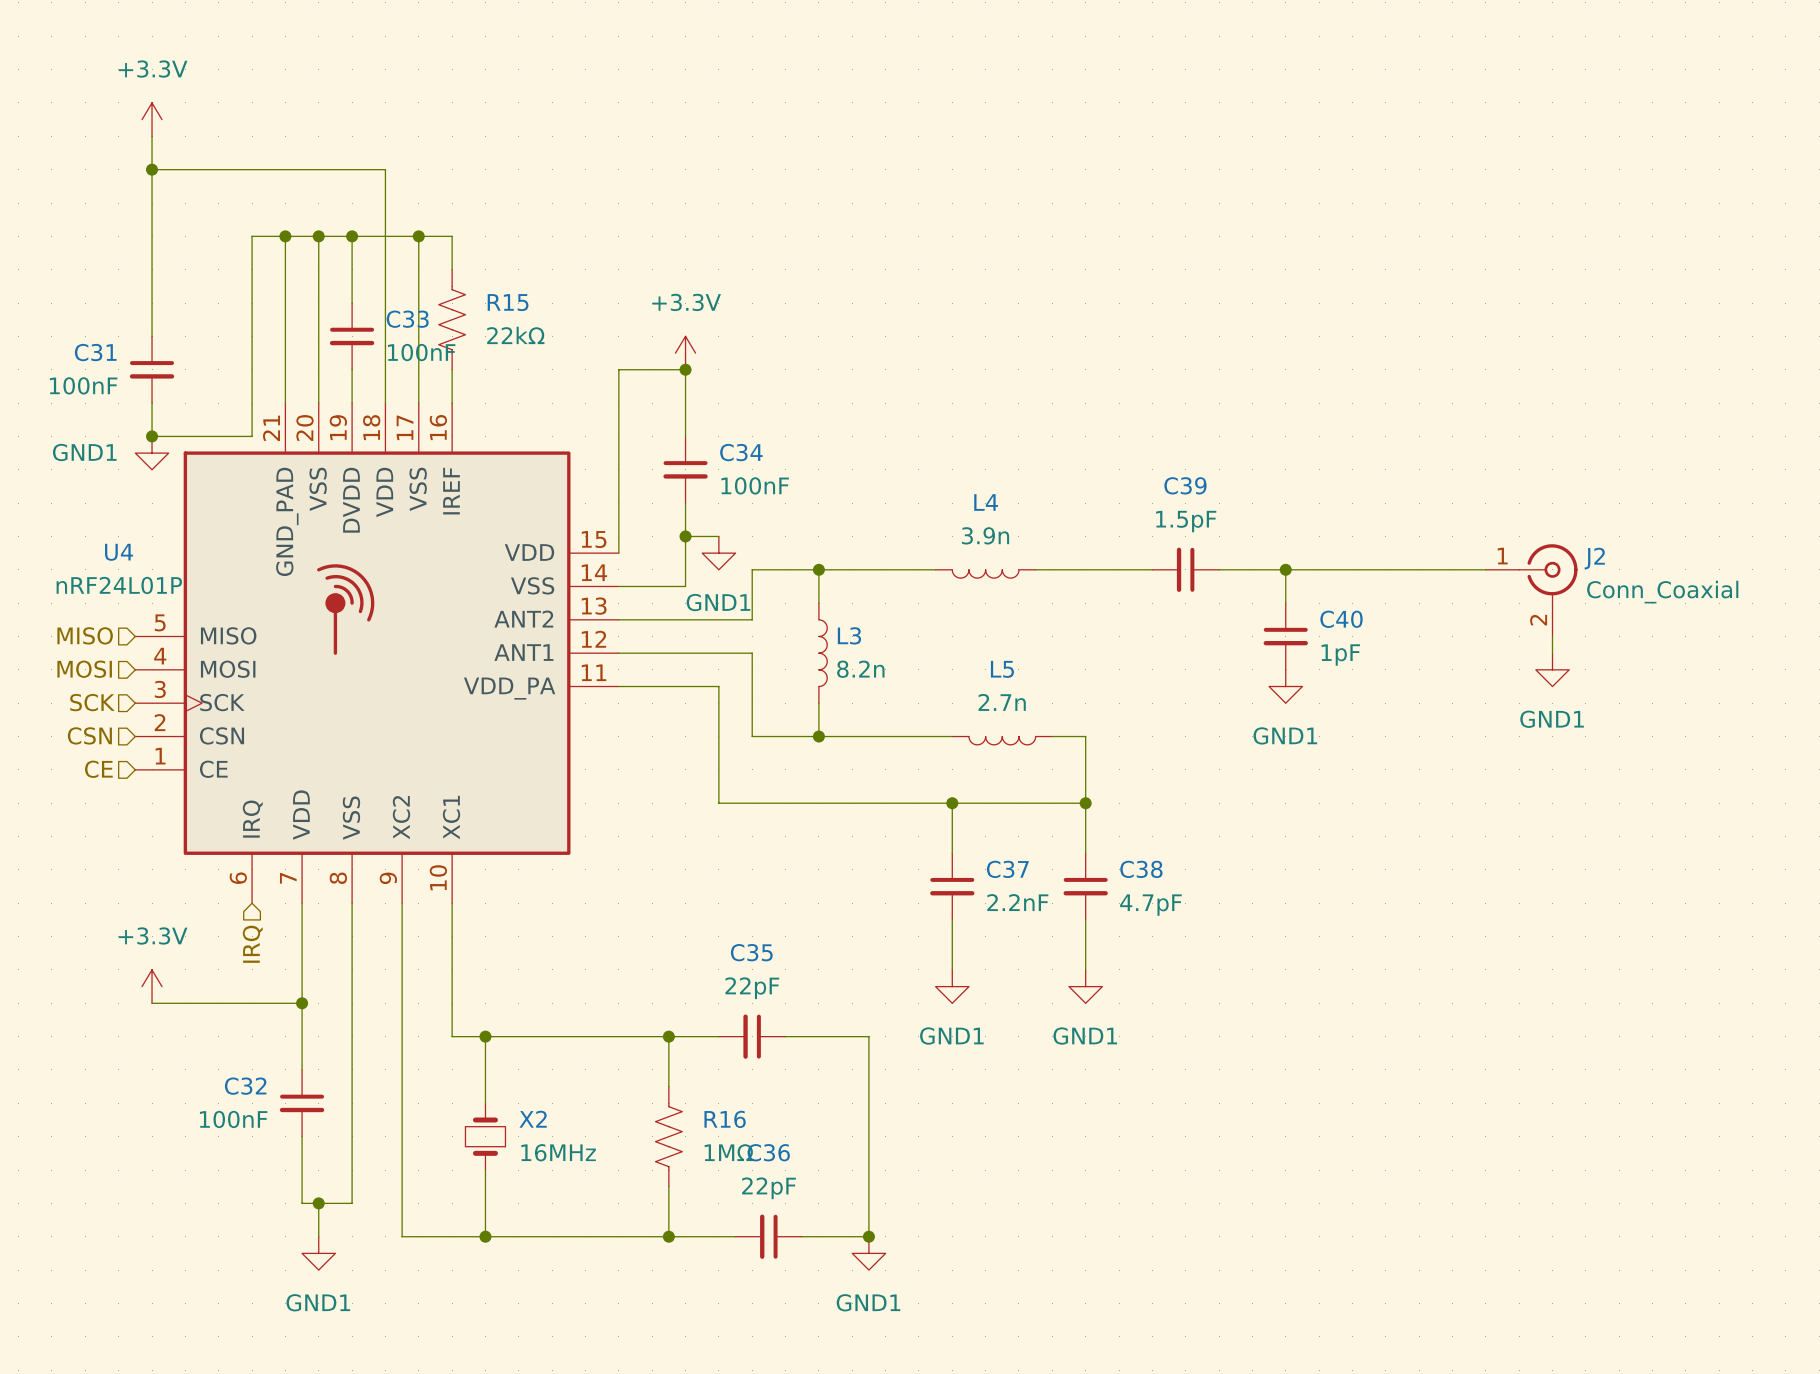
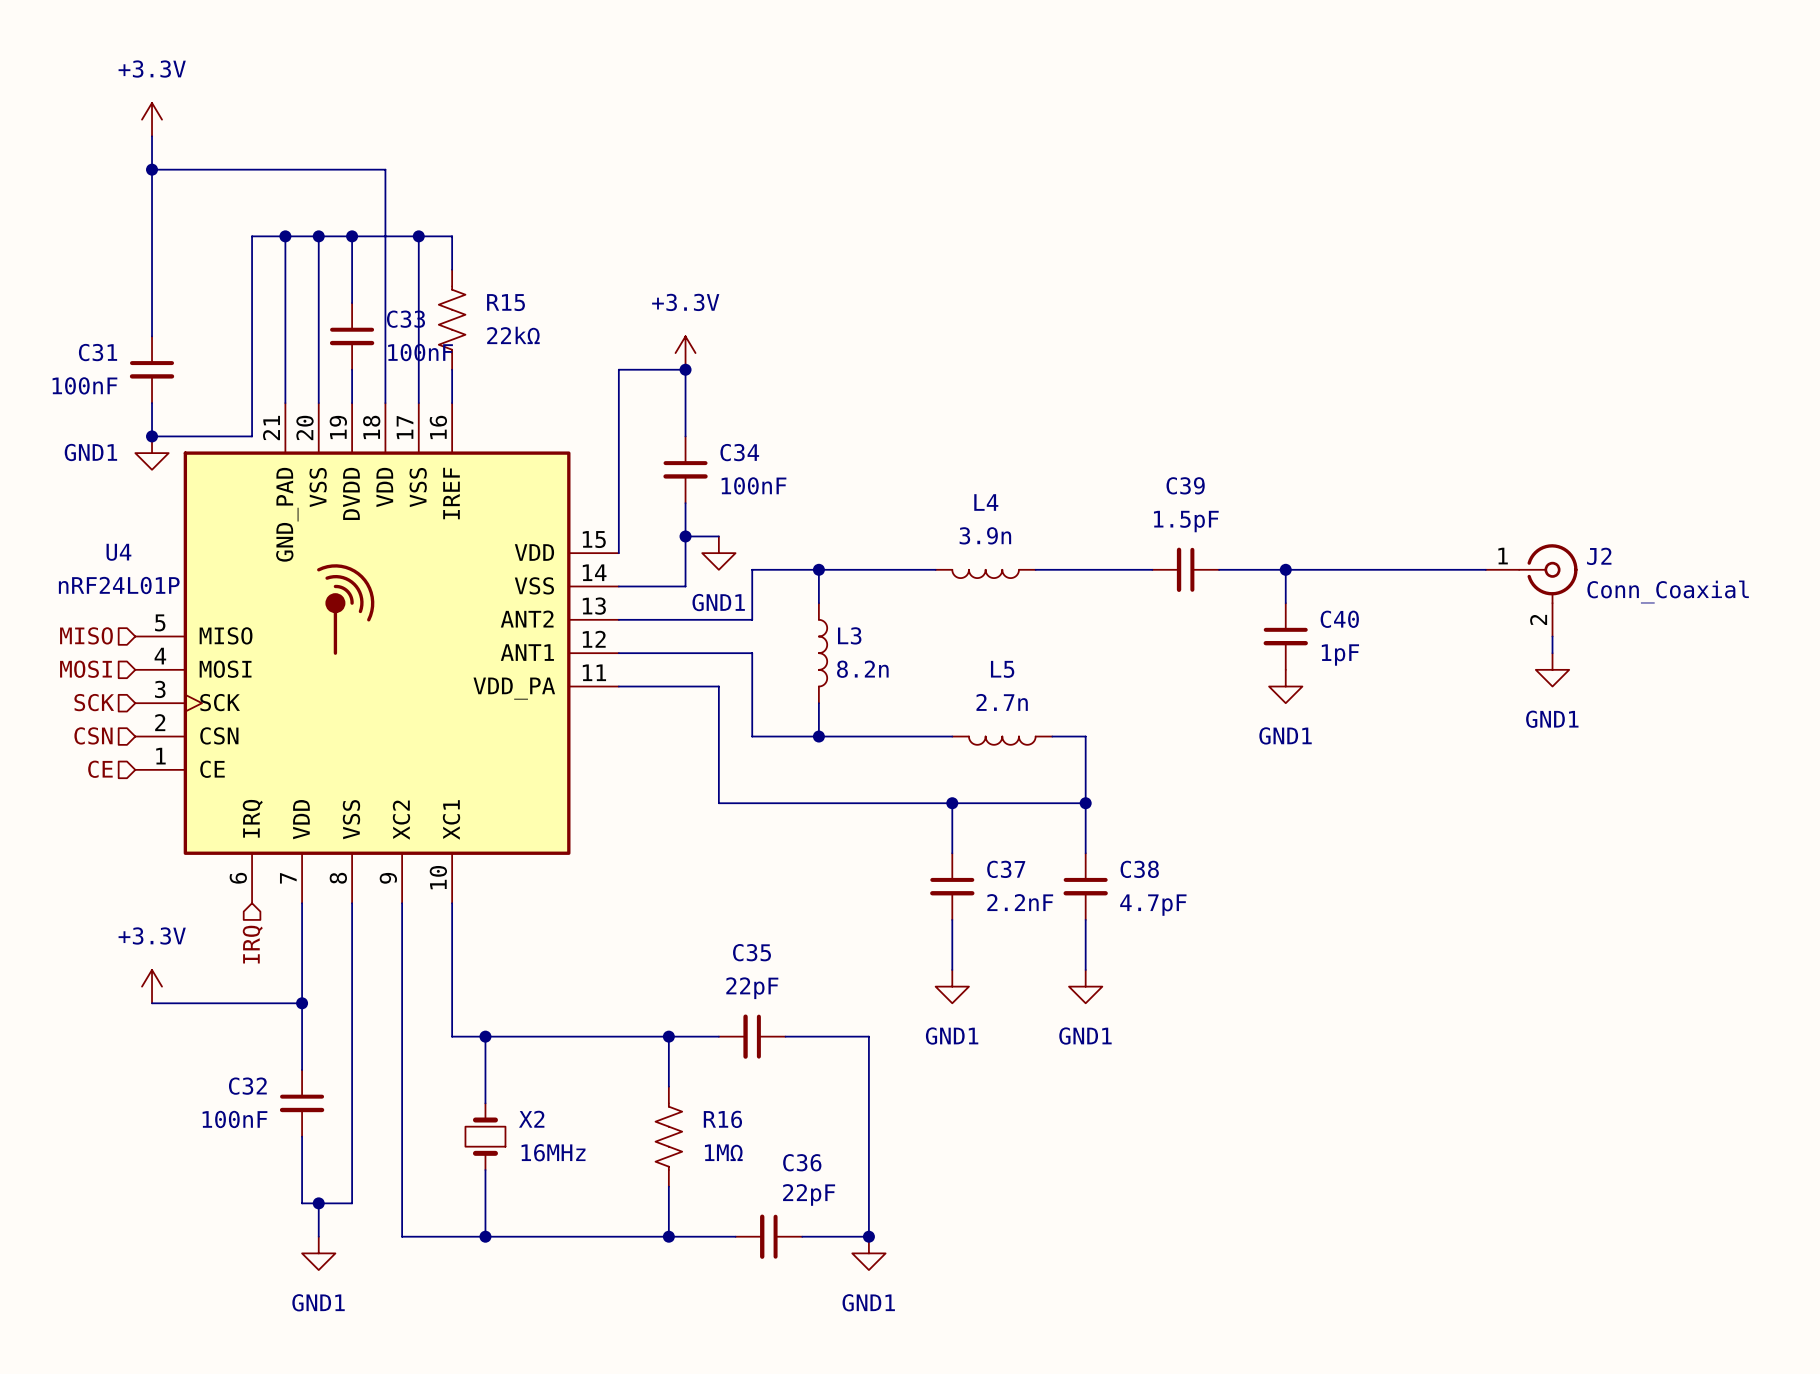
C36 name position: C36 (768, 1152) -> C36 (802, 1162)
C36 value position: 22pF (768, 1188) -> 22pF (809, 1194)

